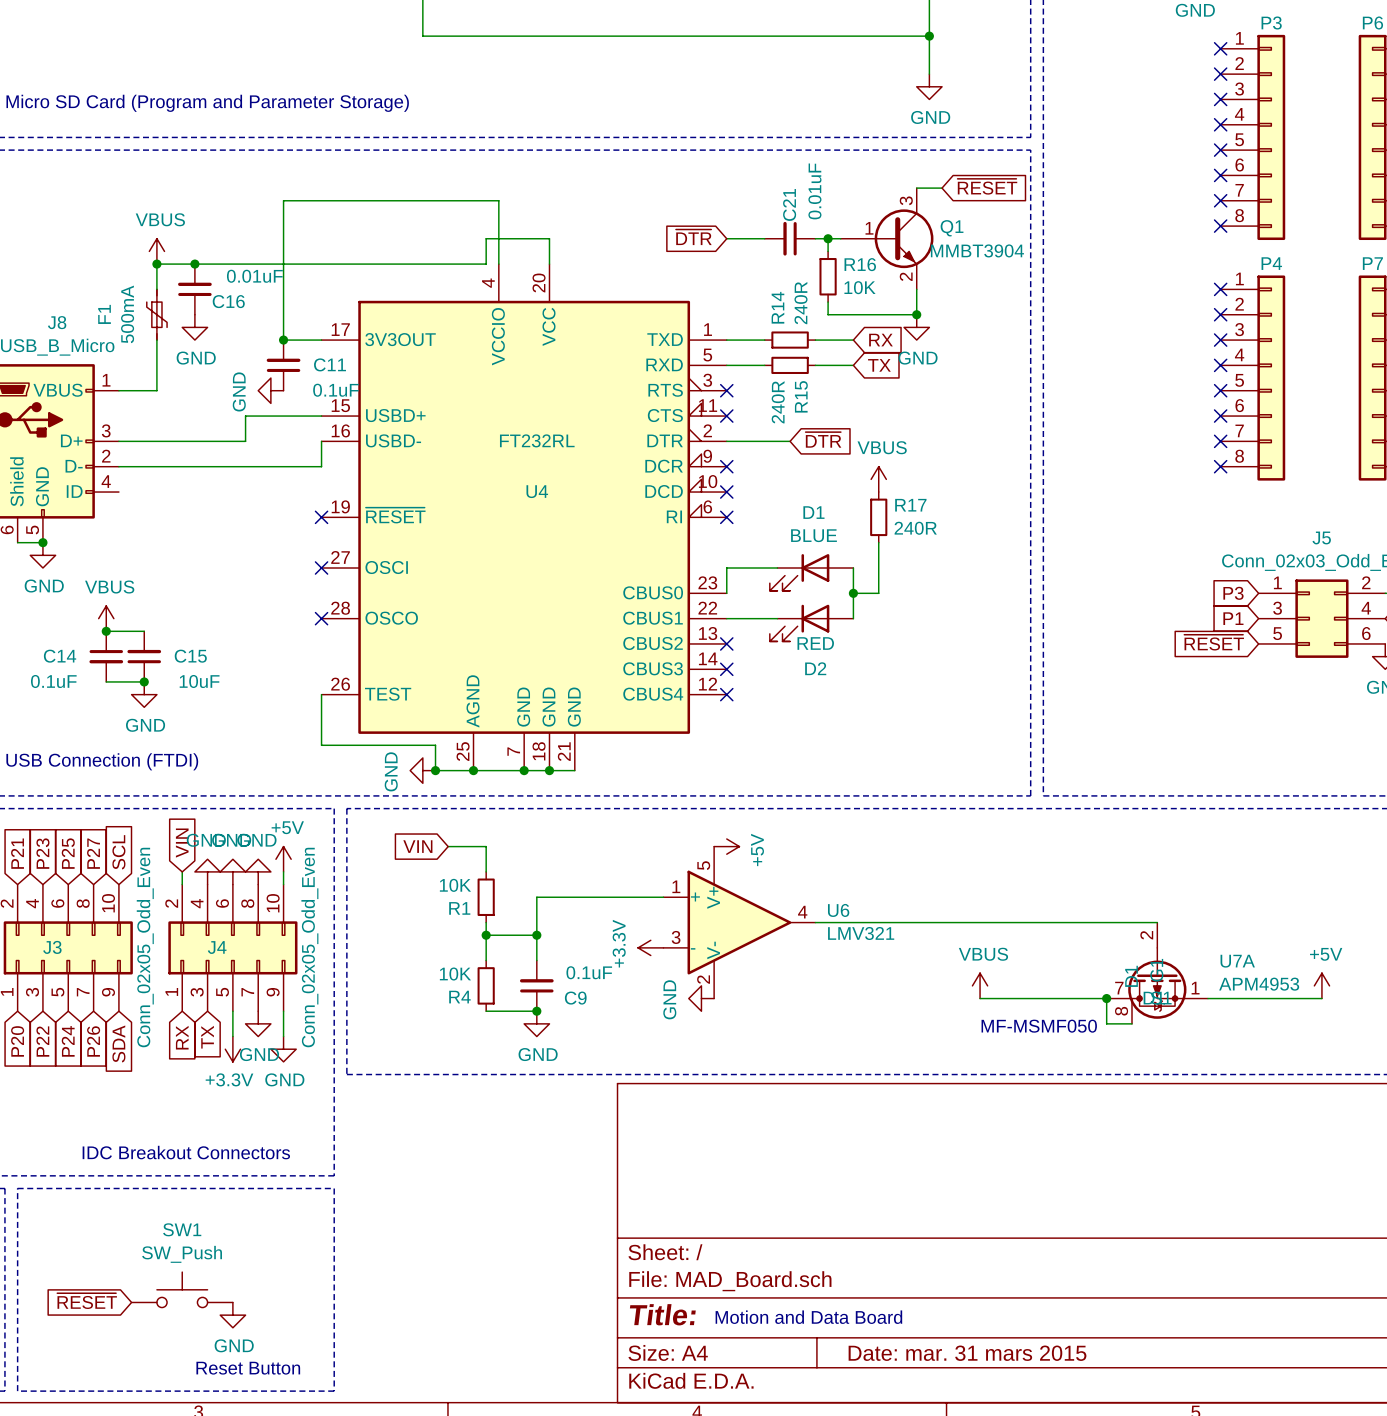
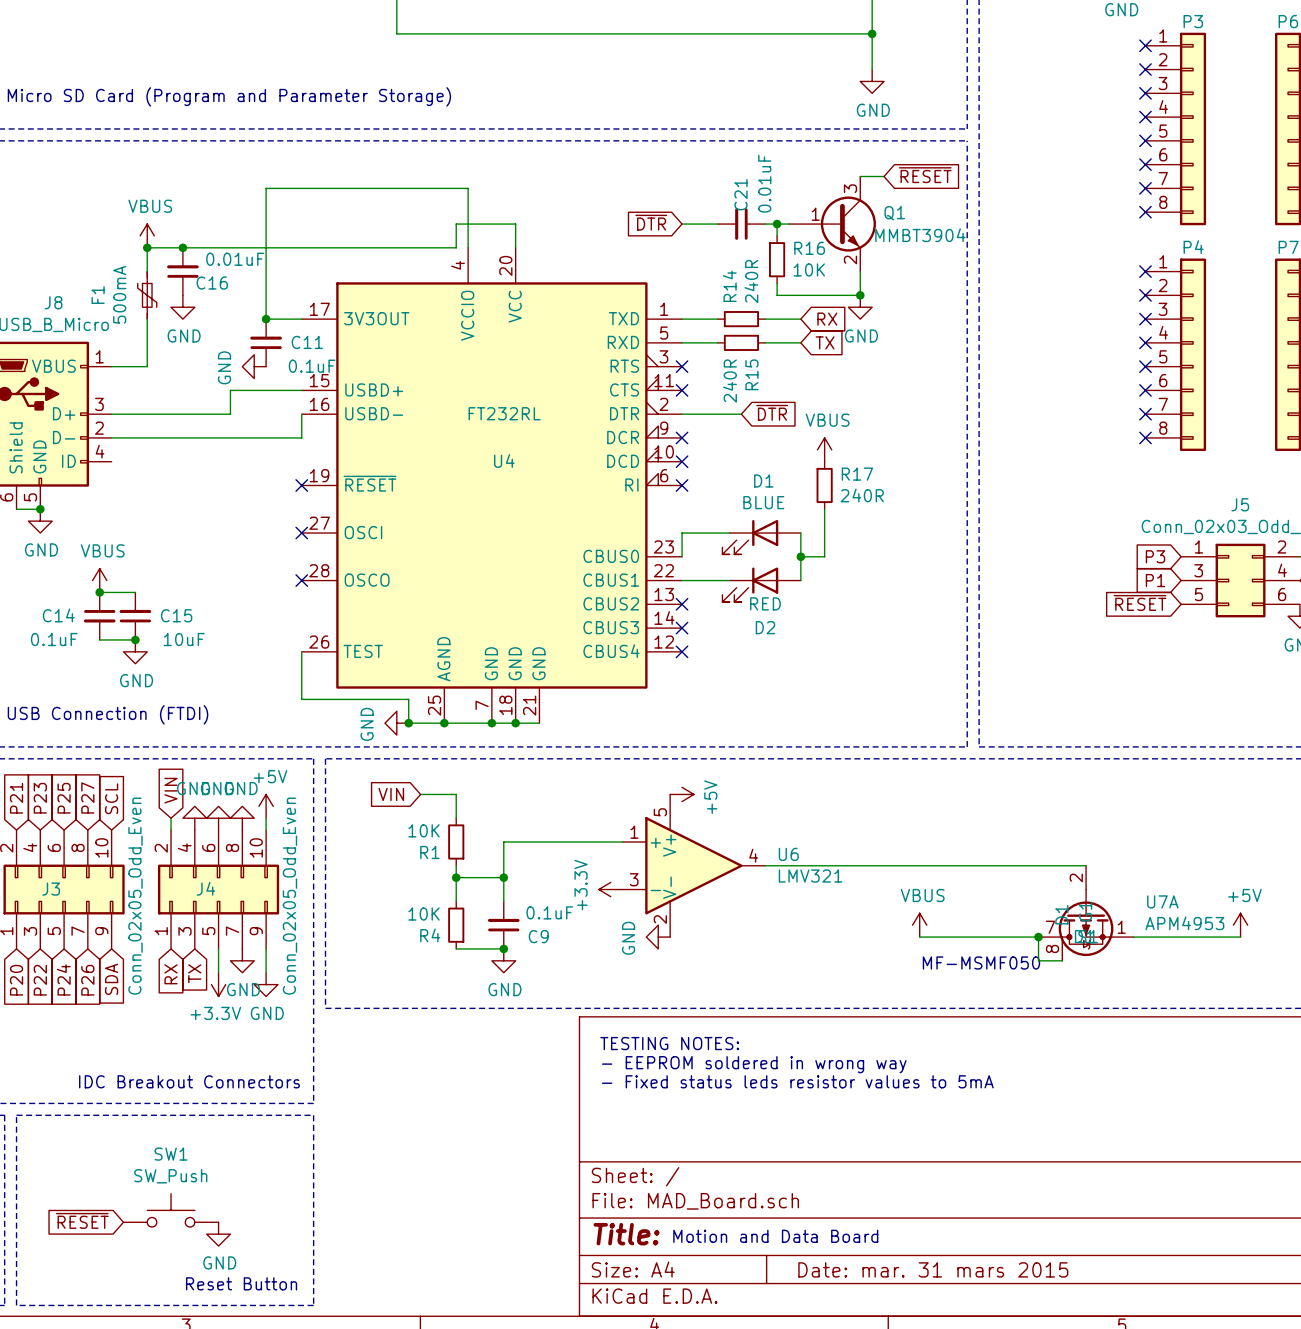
text: none -> TESTING NOTES: (669, 1043)
text: none -> - EEPROM soldered in wrong way (754, 1064)
text: none -> - Fixed status leds resistor values to 5mA (797, 1081)

